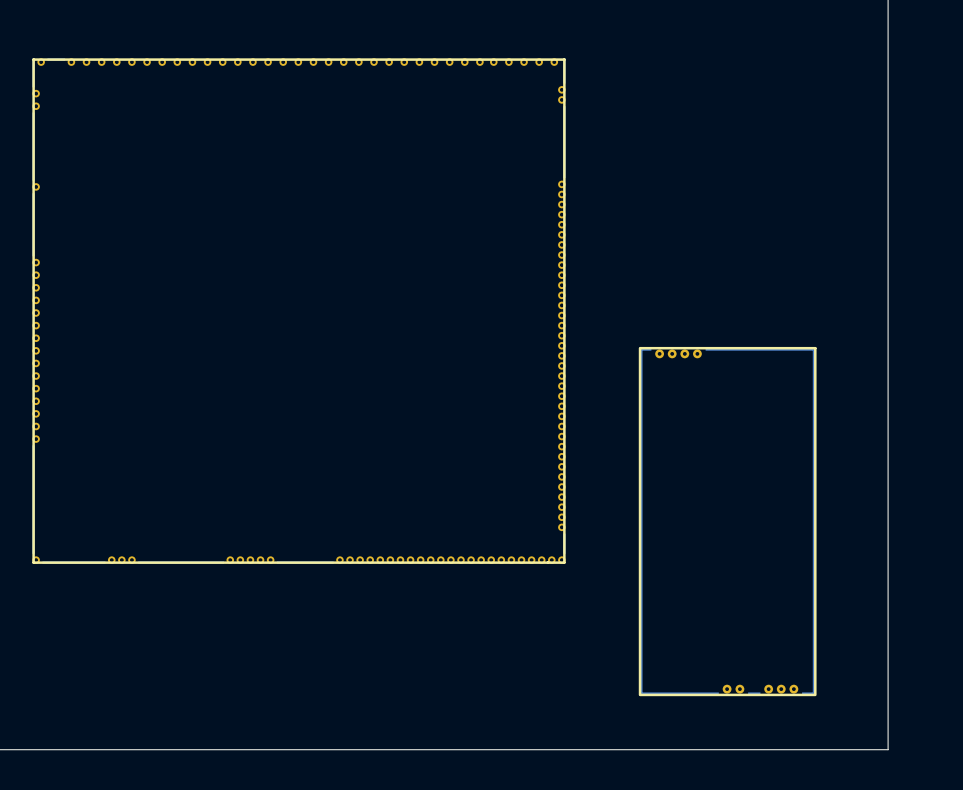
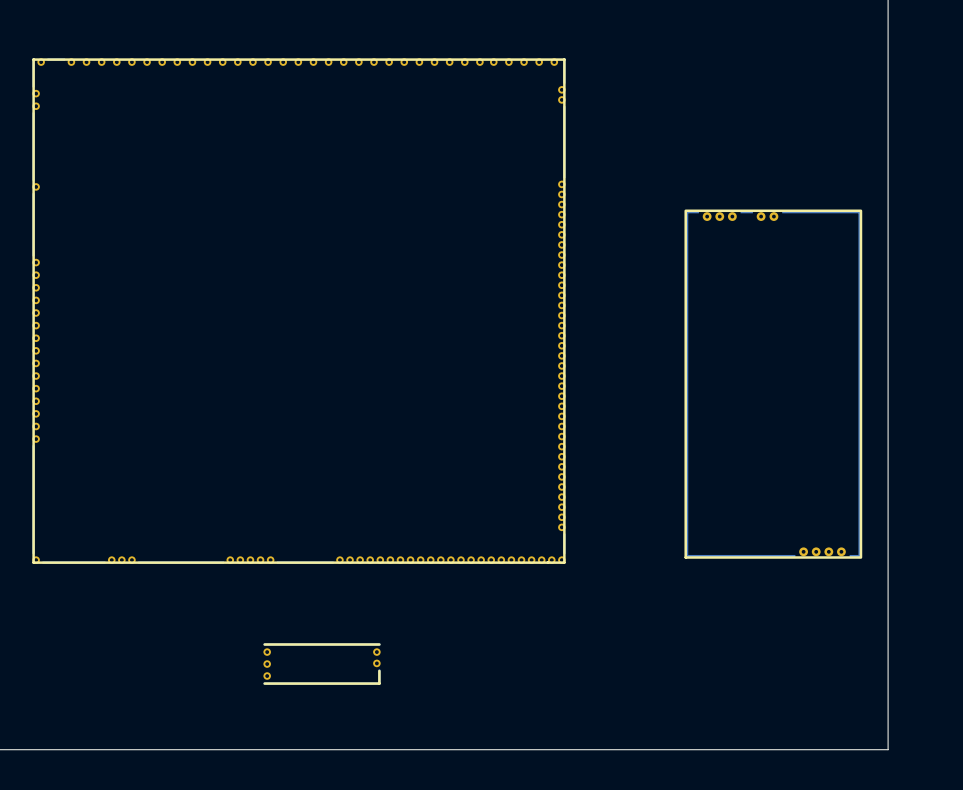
part rotation: 0° (727, 521) -> 180° (773, 384)
part: none -> (322, 664)

